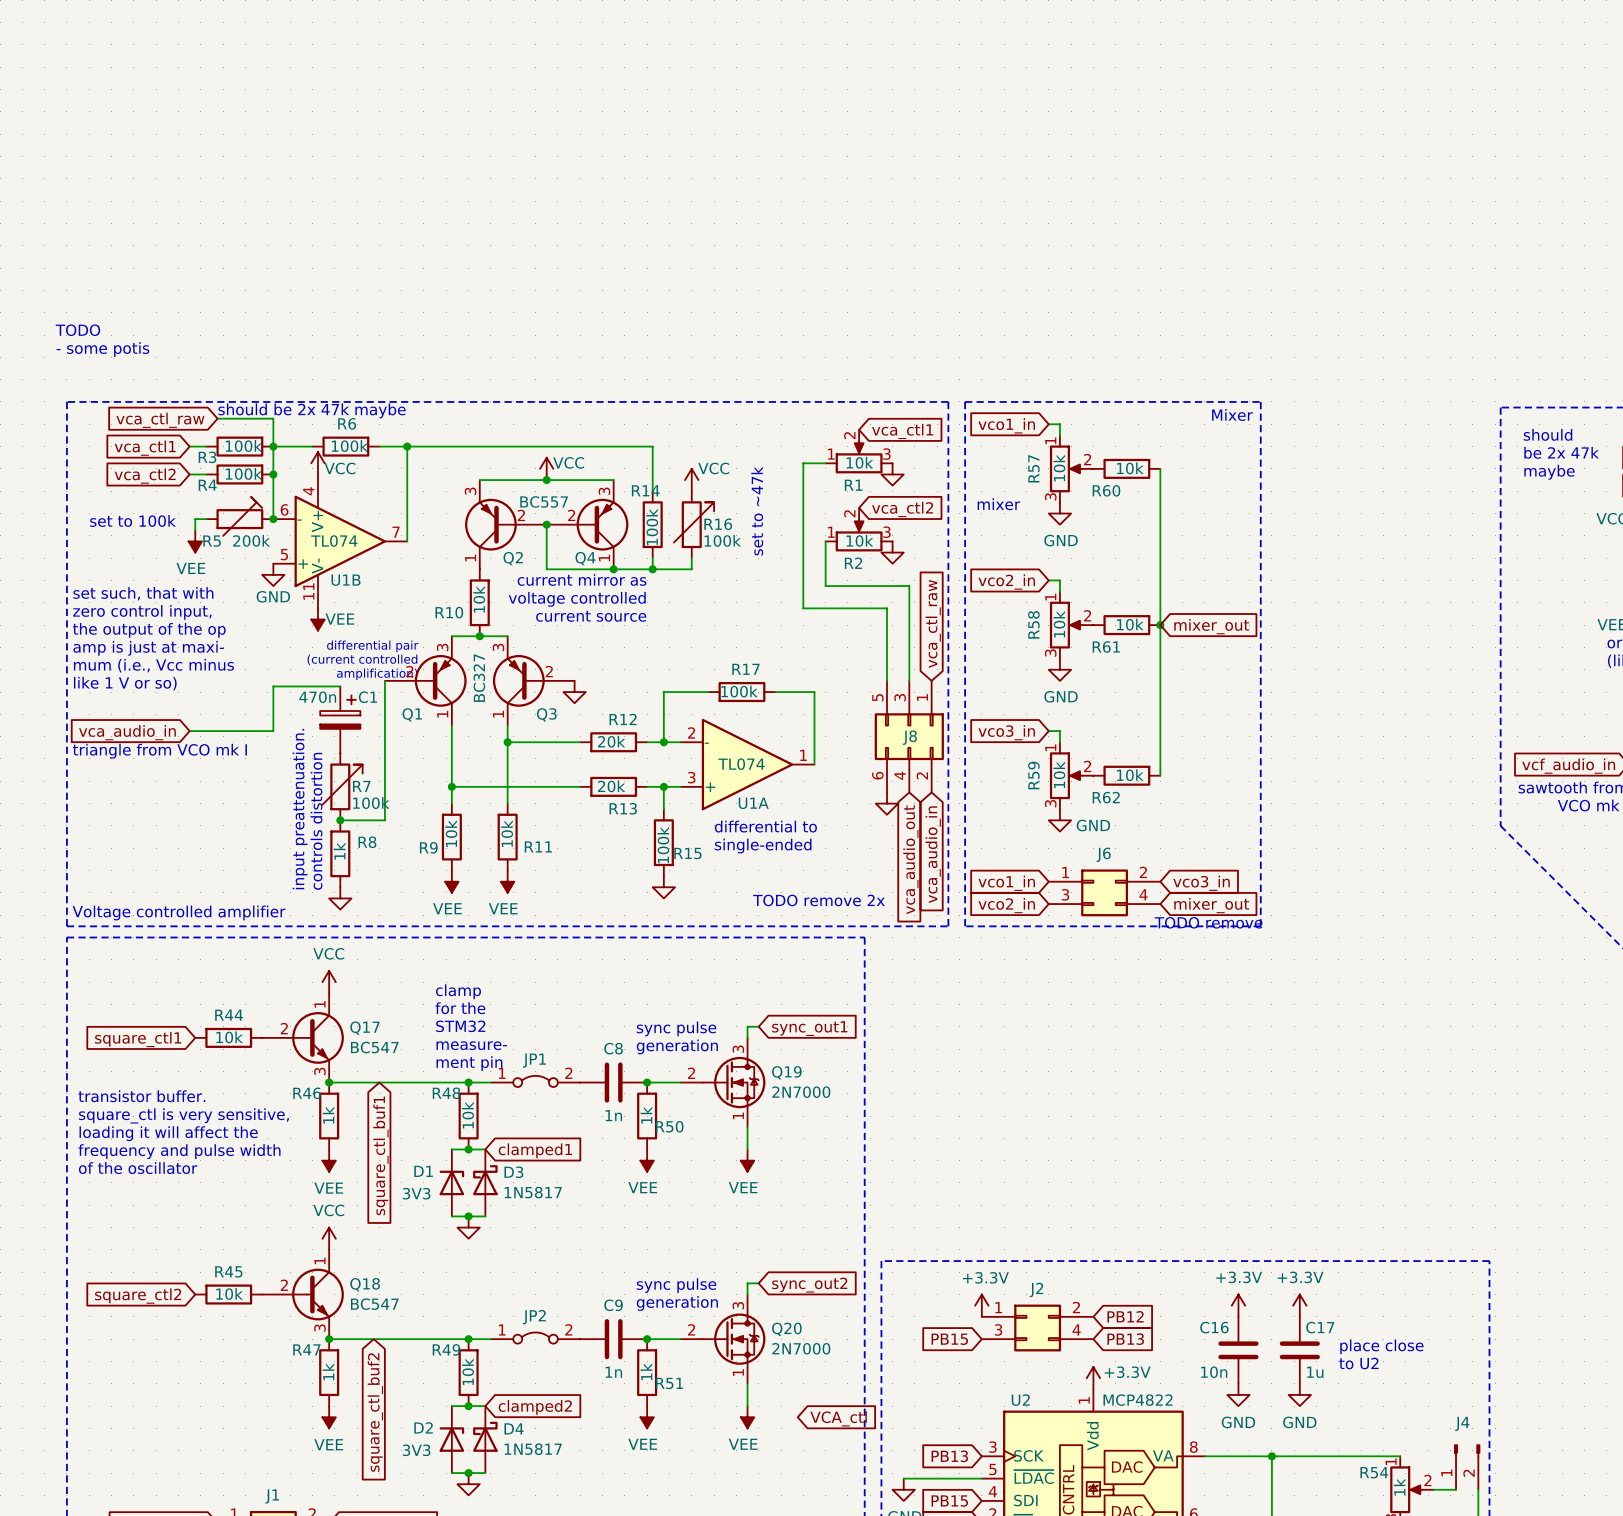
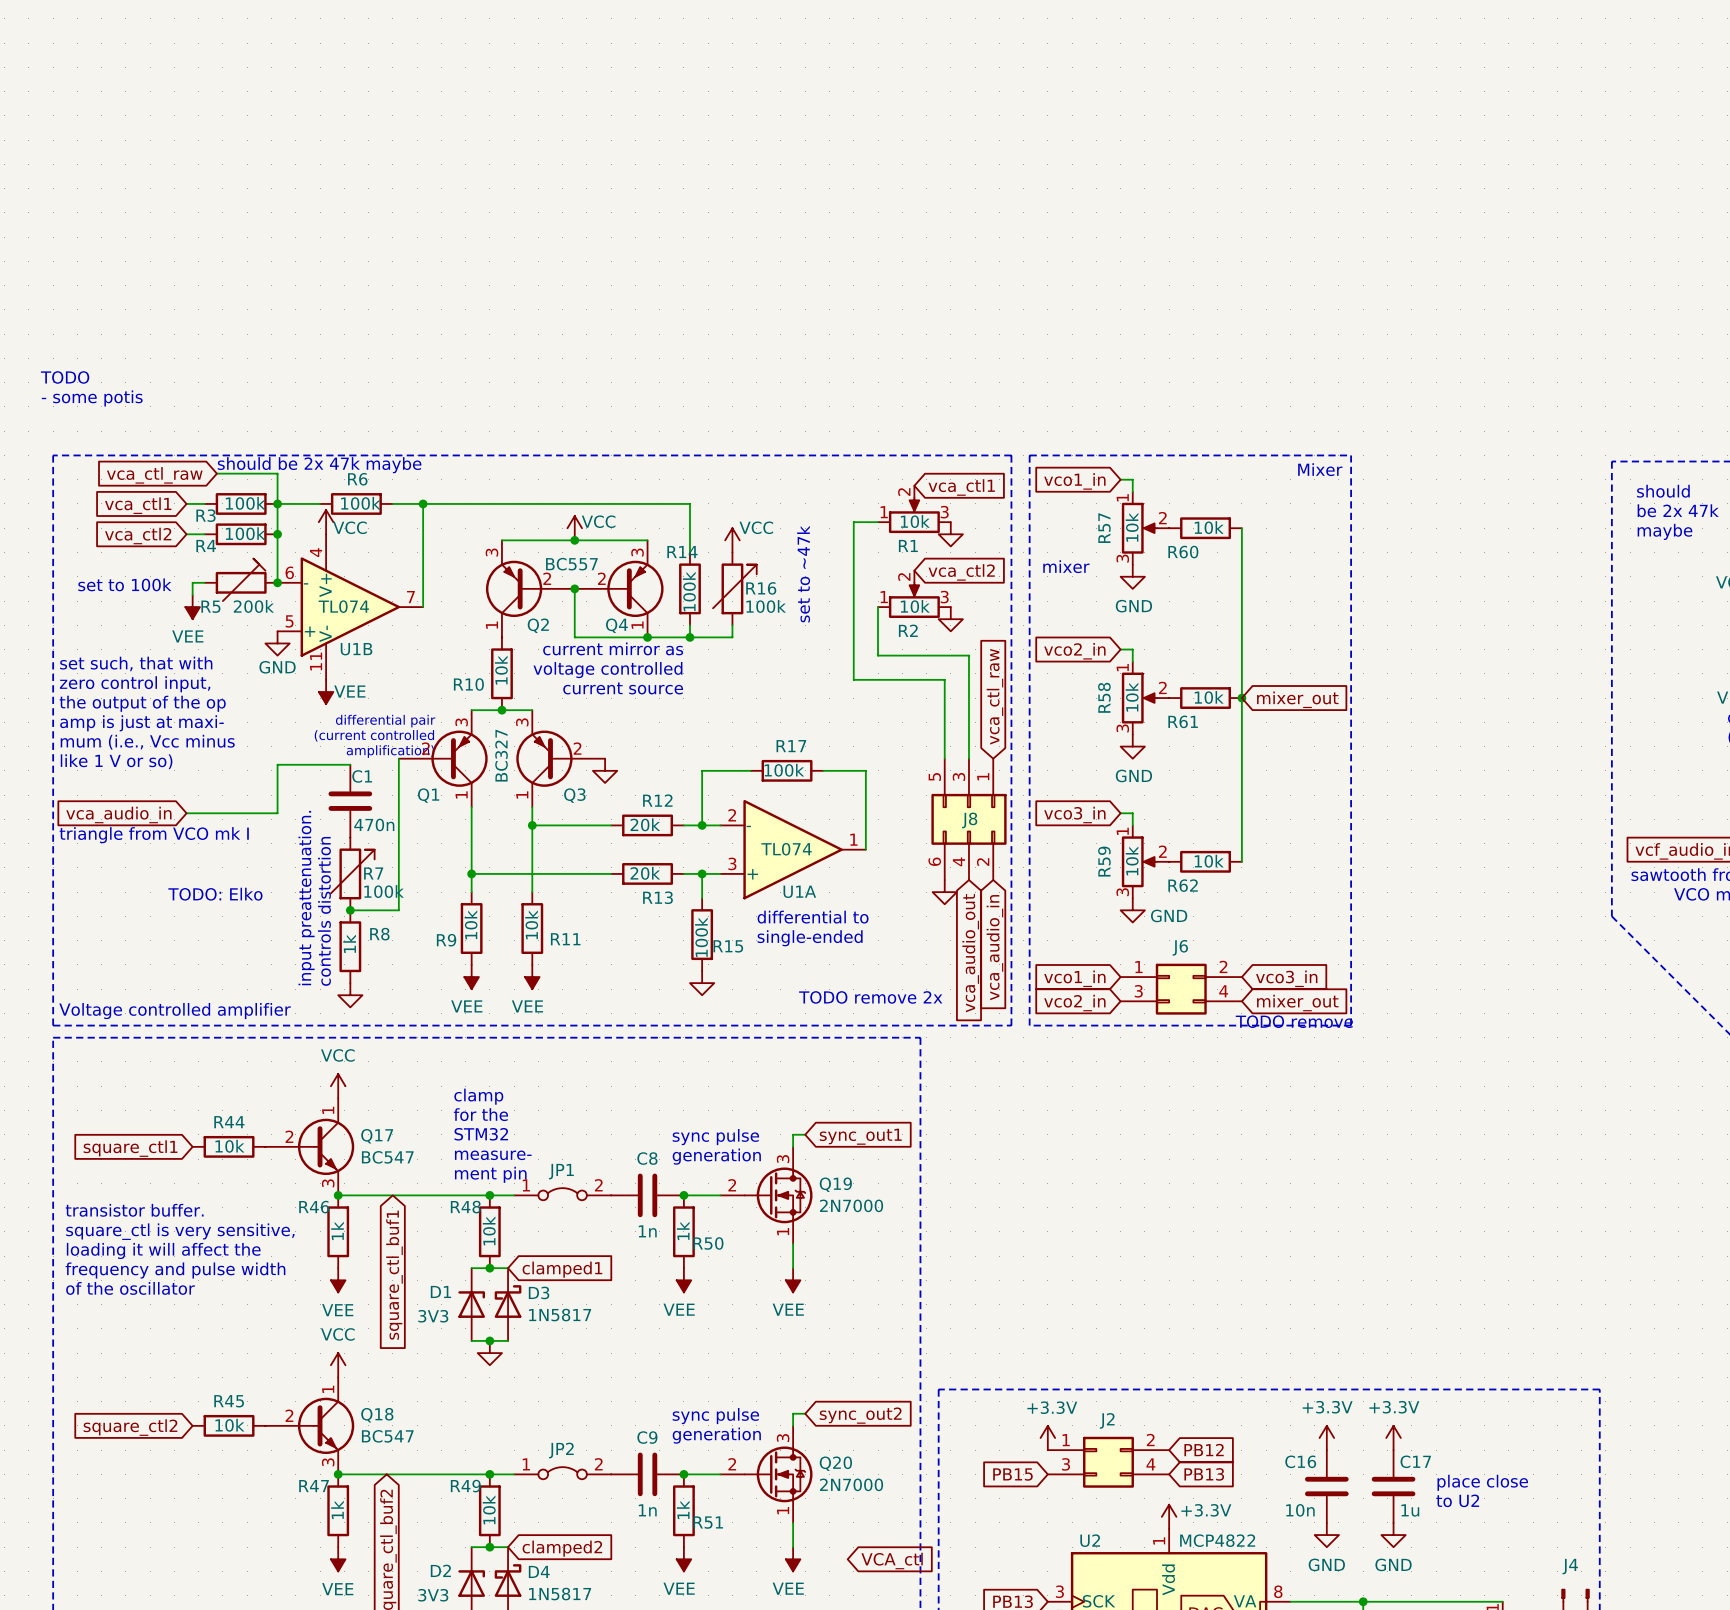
C1 symbol: [320, 686, 361, 754] -> [328, 764, 373, 838]
C1 value position: 470n (317, 697) -> 470n (374, 824)
text: none -> TODO: Elko (215, 894)

